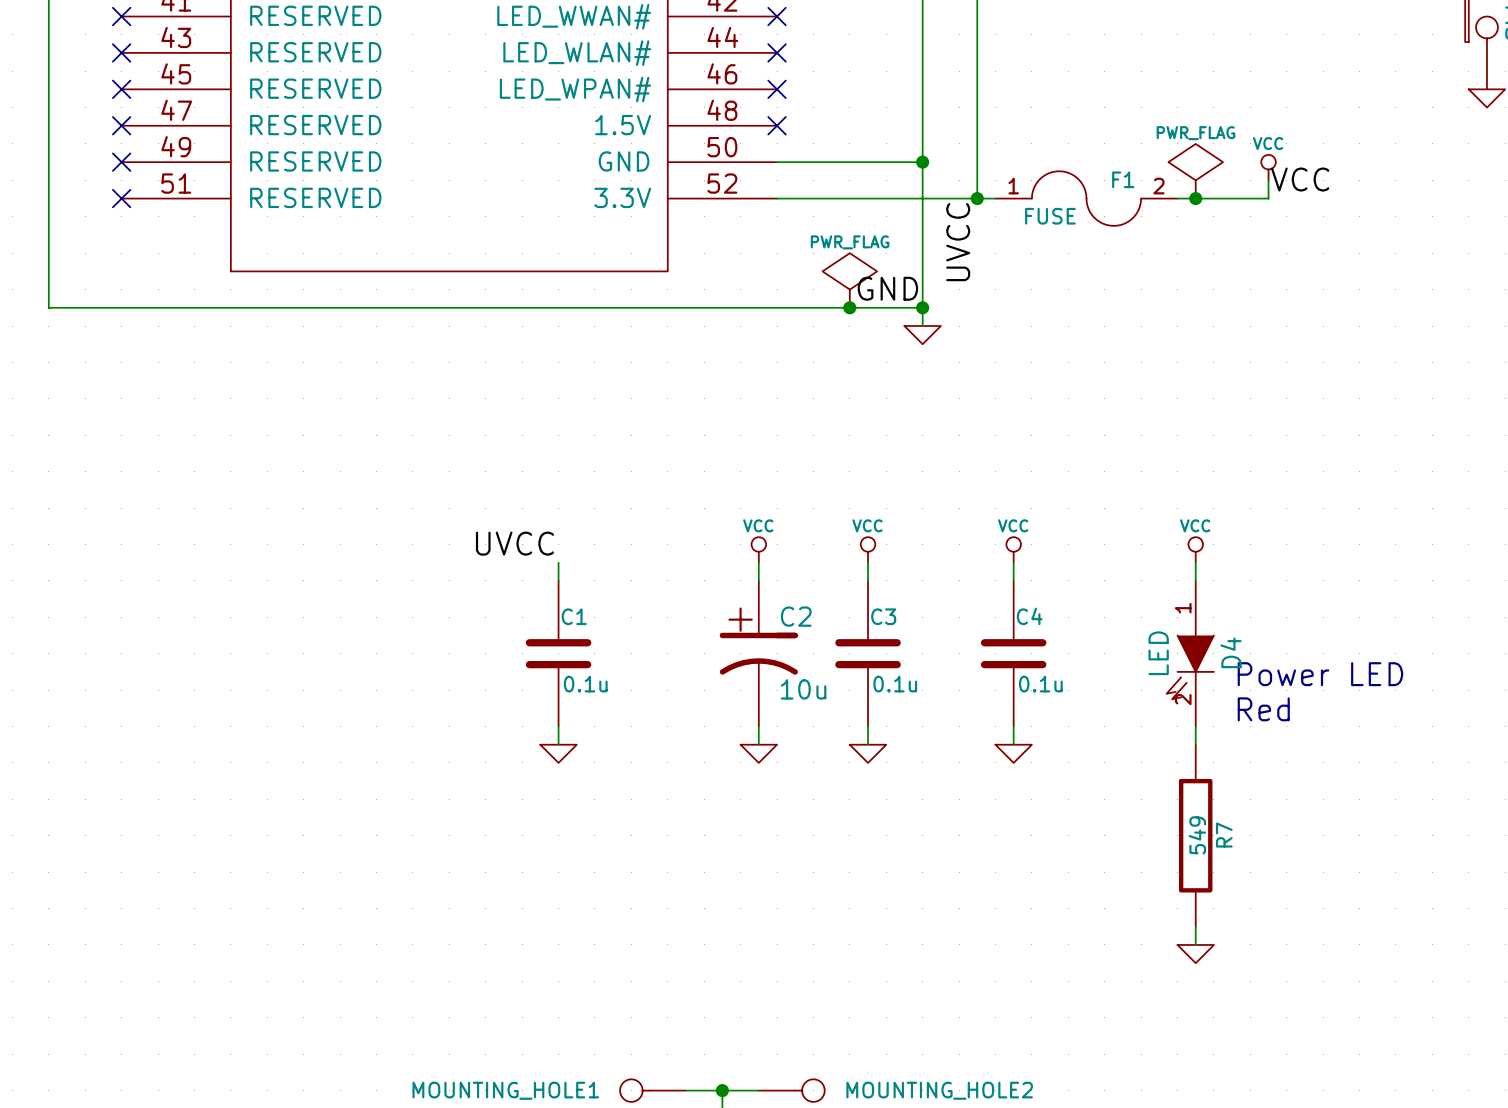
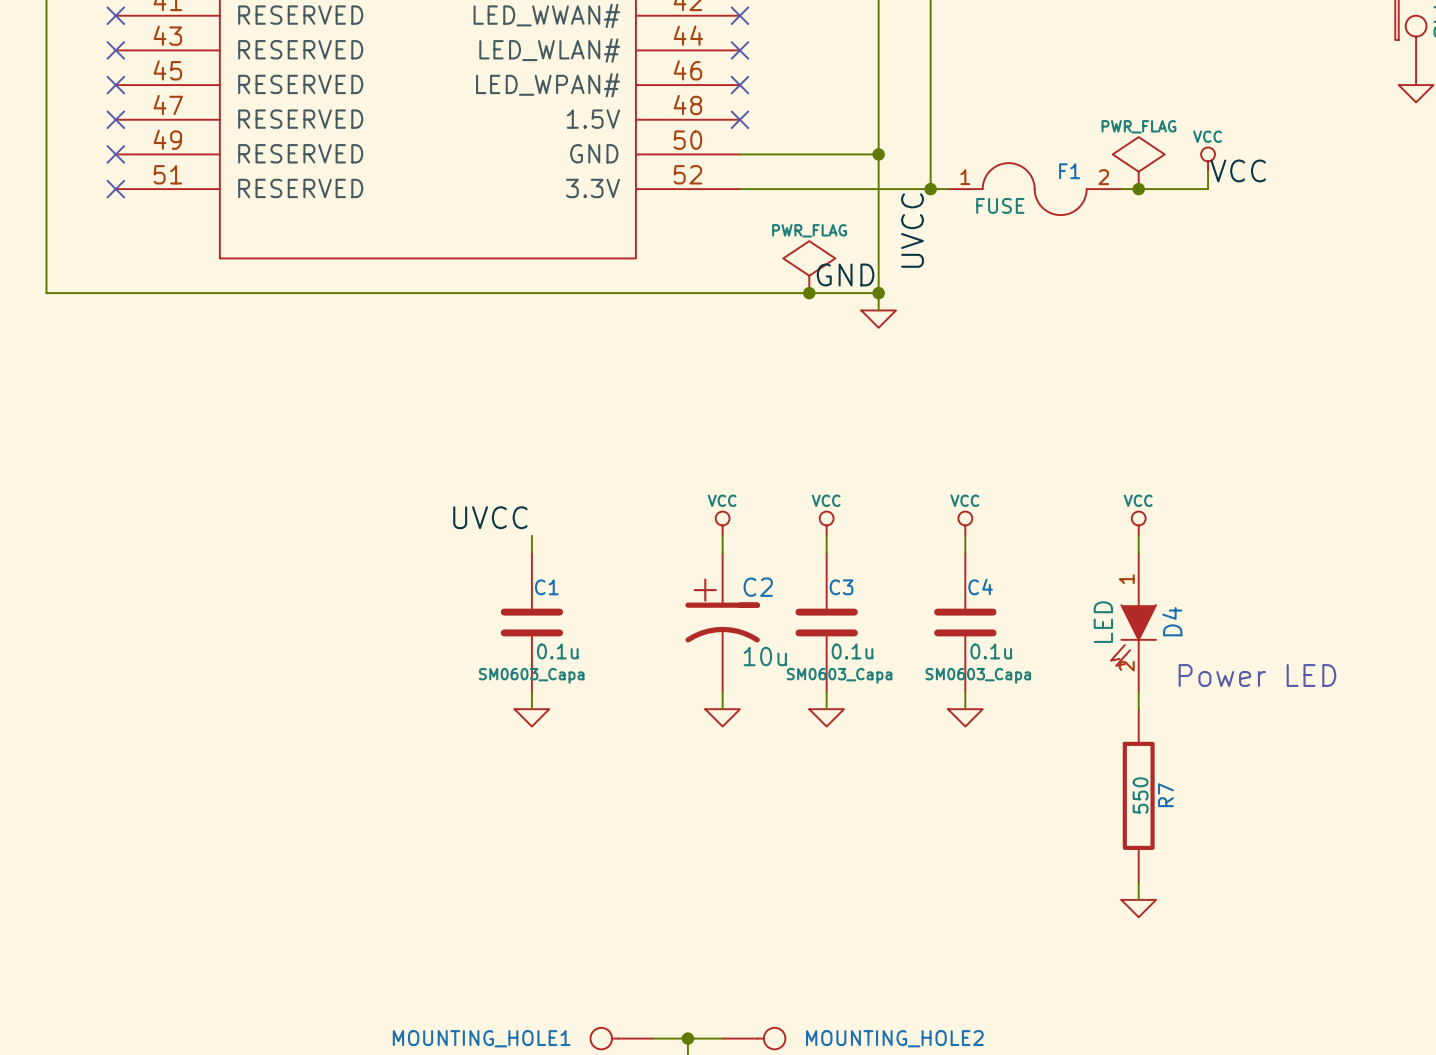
text: Power LED (1320, 674) -> none
C1 text: none -> SM0603_Capa (531, 675)
C3 text: none -> SM0603_Capa (839, 675)
C4 text: none -> SM0603_Capa (978, 675)
text: Red (1263, 709) -> Power LED (1257, 675)
R7 value: 549 (1197, 835) -> 550 (1140, 795)

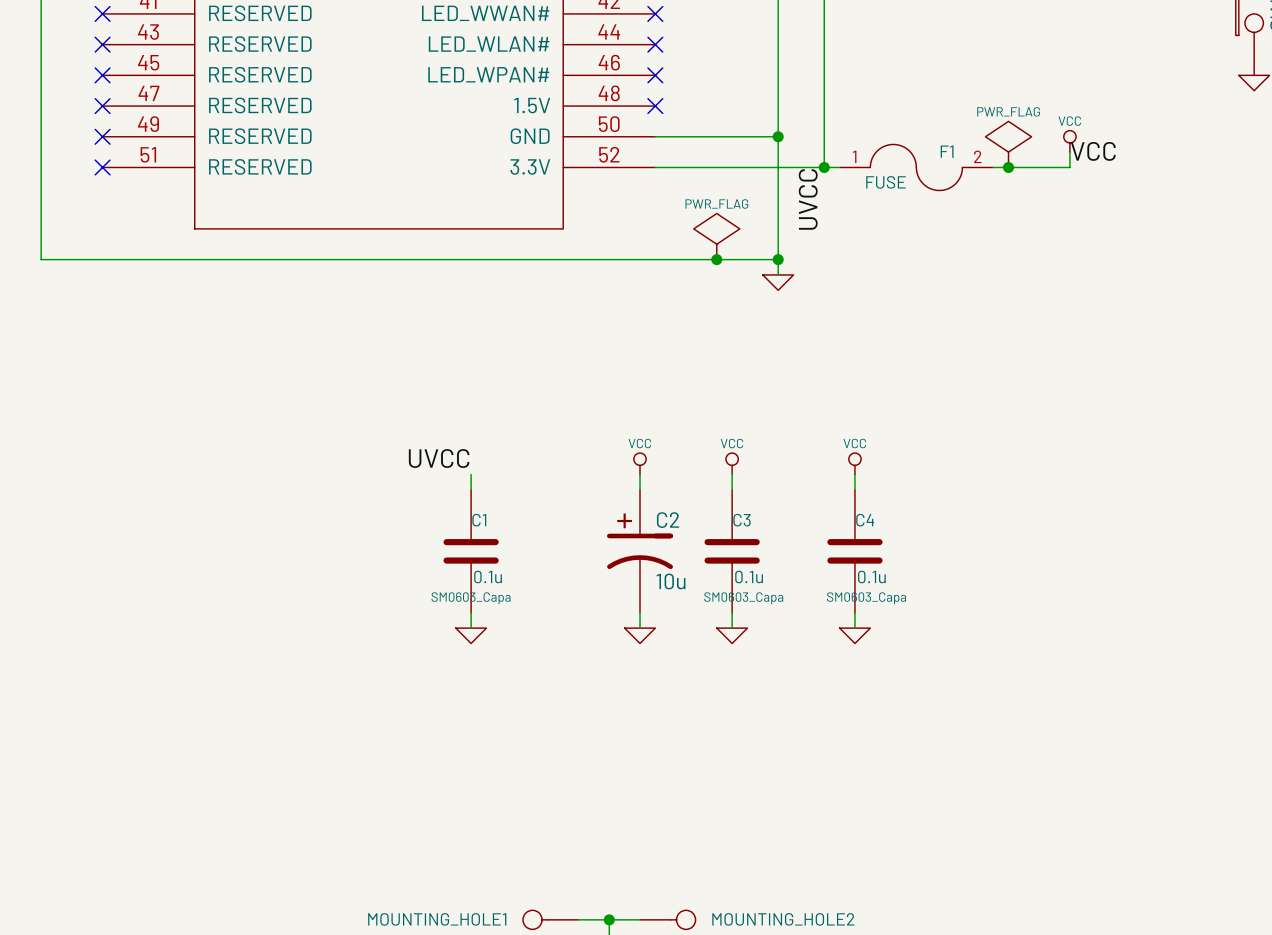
label: GND (845, 274) -> none
power symbol: VCC (1138, 523) -> none
wire: (1138, 535) (1138, 553) -> none
D4: LED (1133, 622) -> none
text: Power LED (1257, 675) -> none
wire: (1138, 691) (1138, 709) -> none
R7: 550 (1138, 795) -> none
wire: (1138, 882) (1138, 899) -> none
power symbol: (1138, 908) -> none

